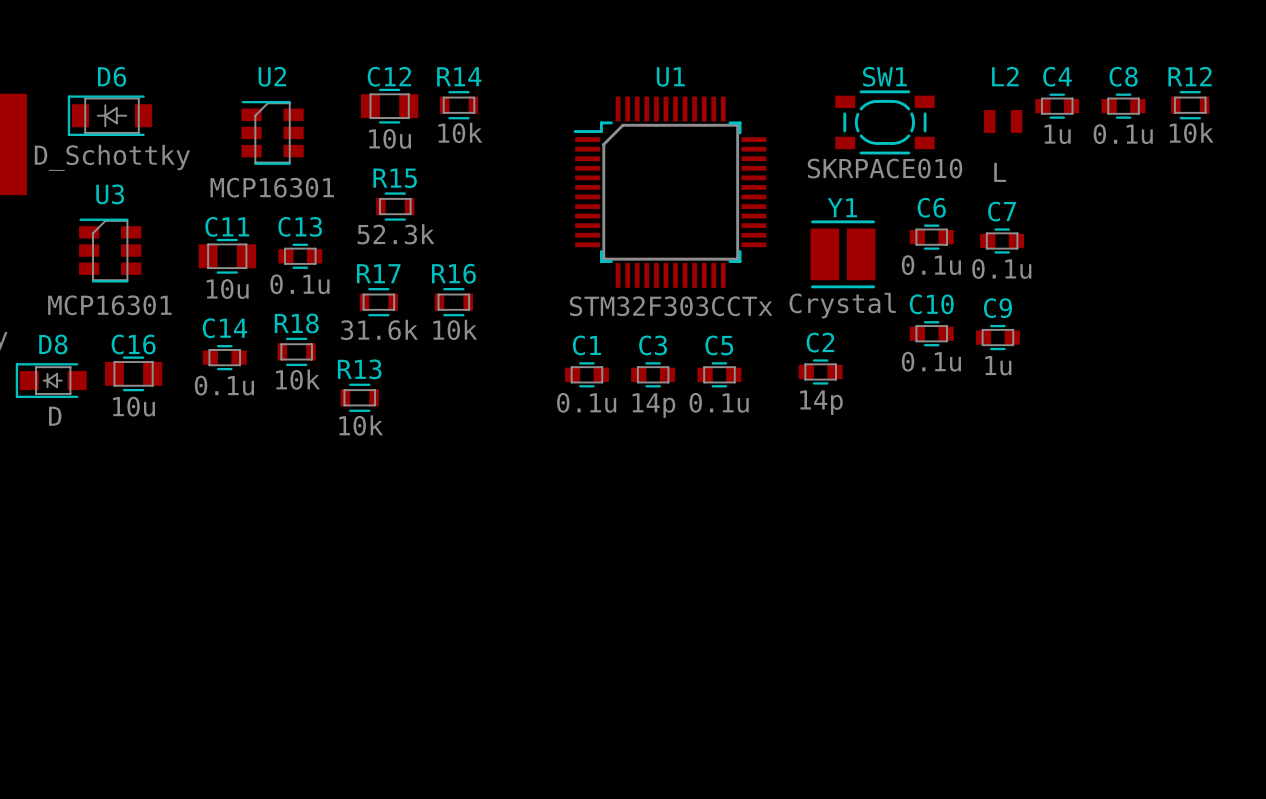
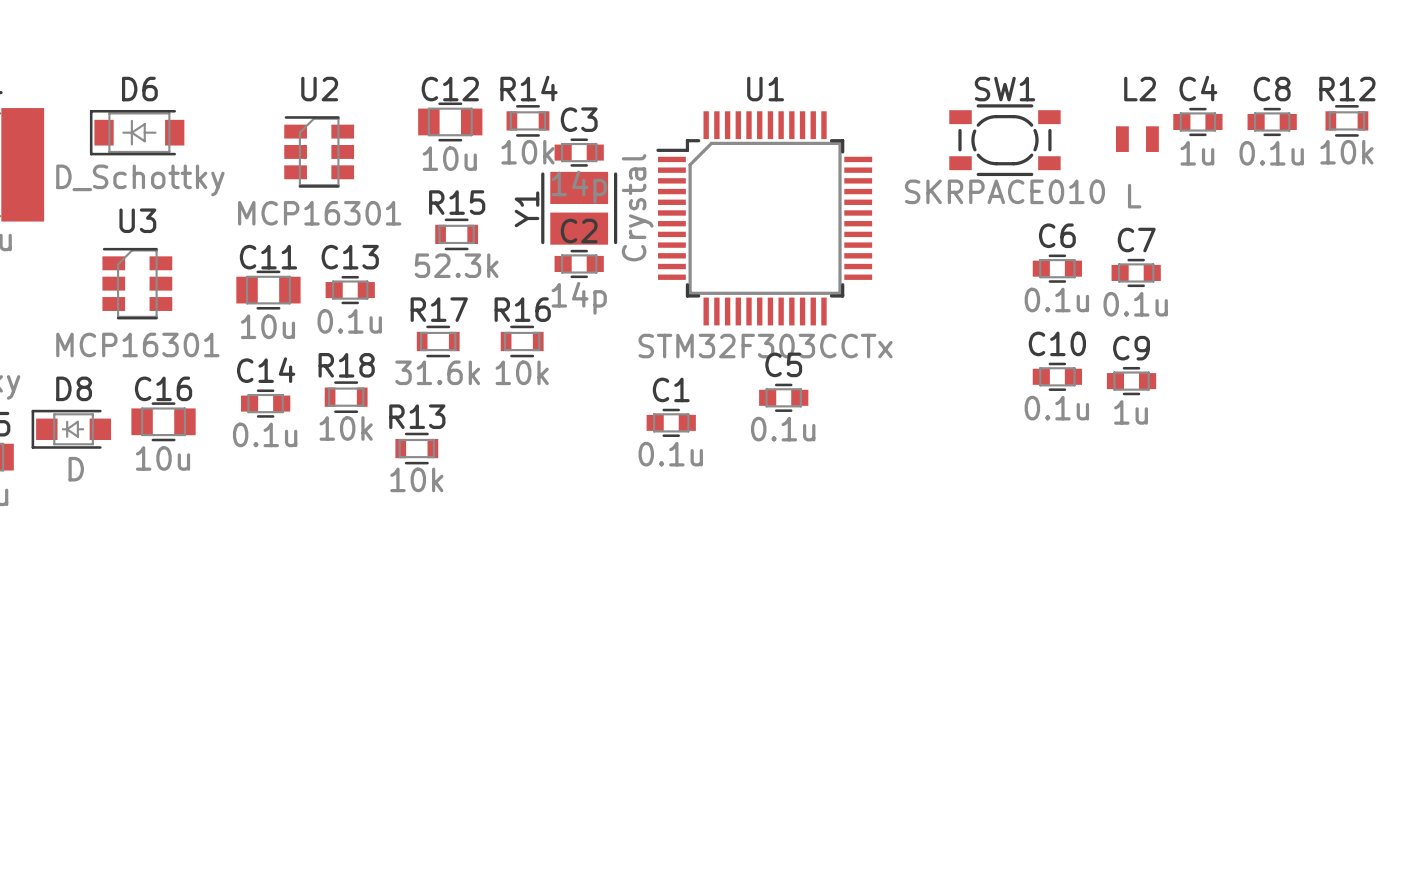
Y1 name position: Y1 (842, 207) -> Y1 (527, 209)
Y1 rotation: 0° (843, 254) -> 90° clockwise (579, 208)
Y1 position: (843, 254) -> (579, 208)
Y1 value position: Crystal (842, 305) -> Crystal (637, 207)
C2 position: (820, 371) -> (579, 263)
C3 position: (653, 374) -> (579, 152)
C5 position: (719, 374) -> (783, 397)

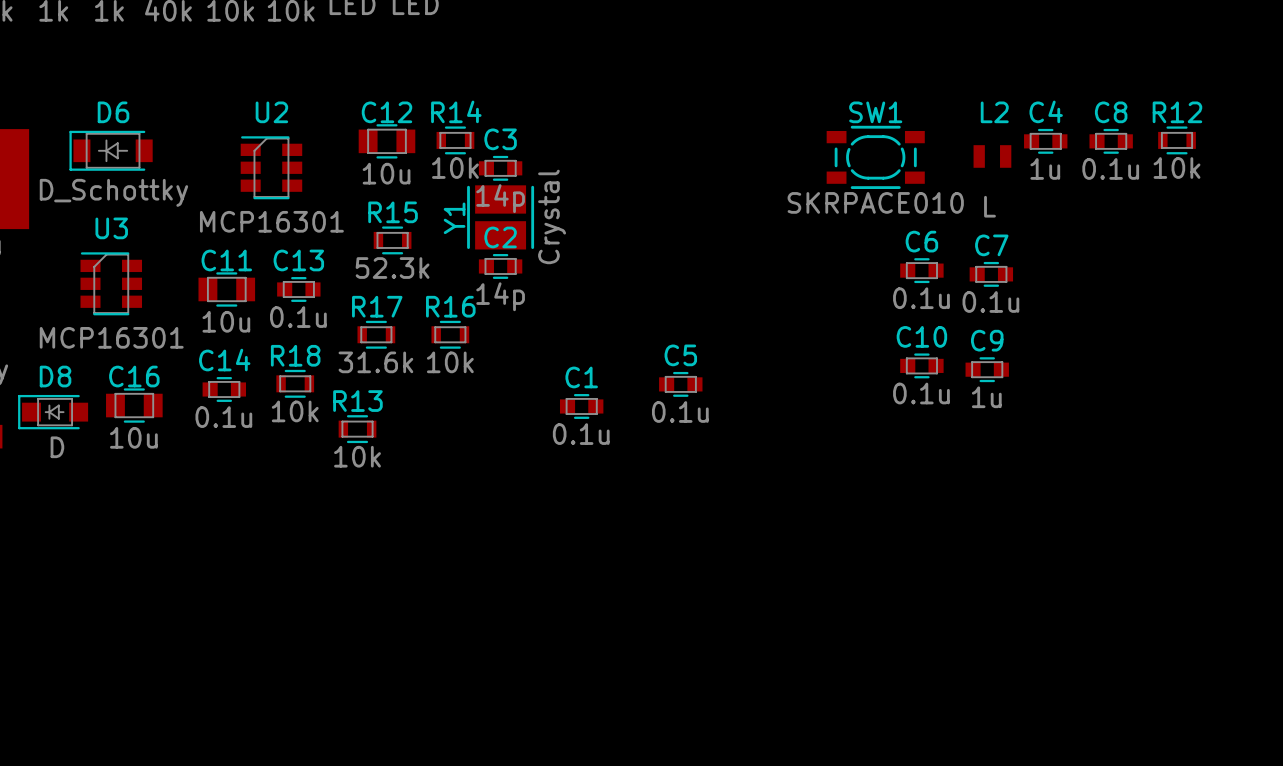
U1: STM32F303CCTx (764, 218) -> none

